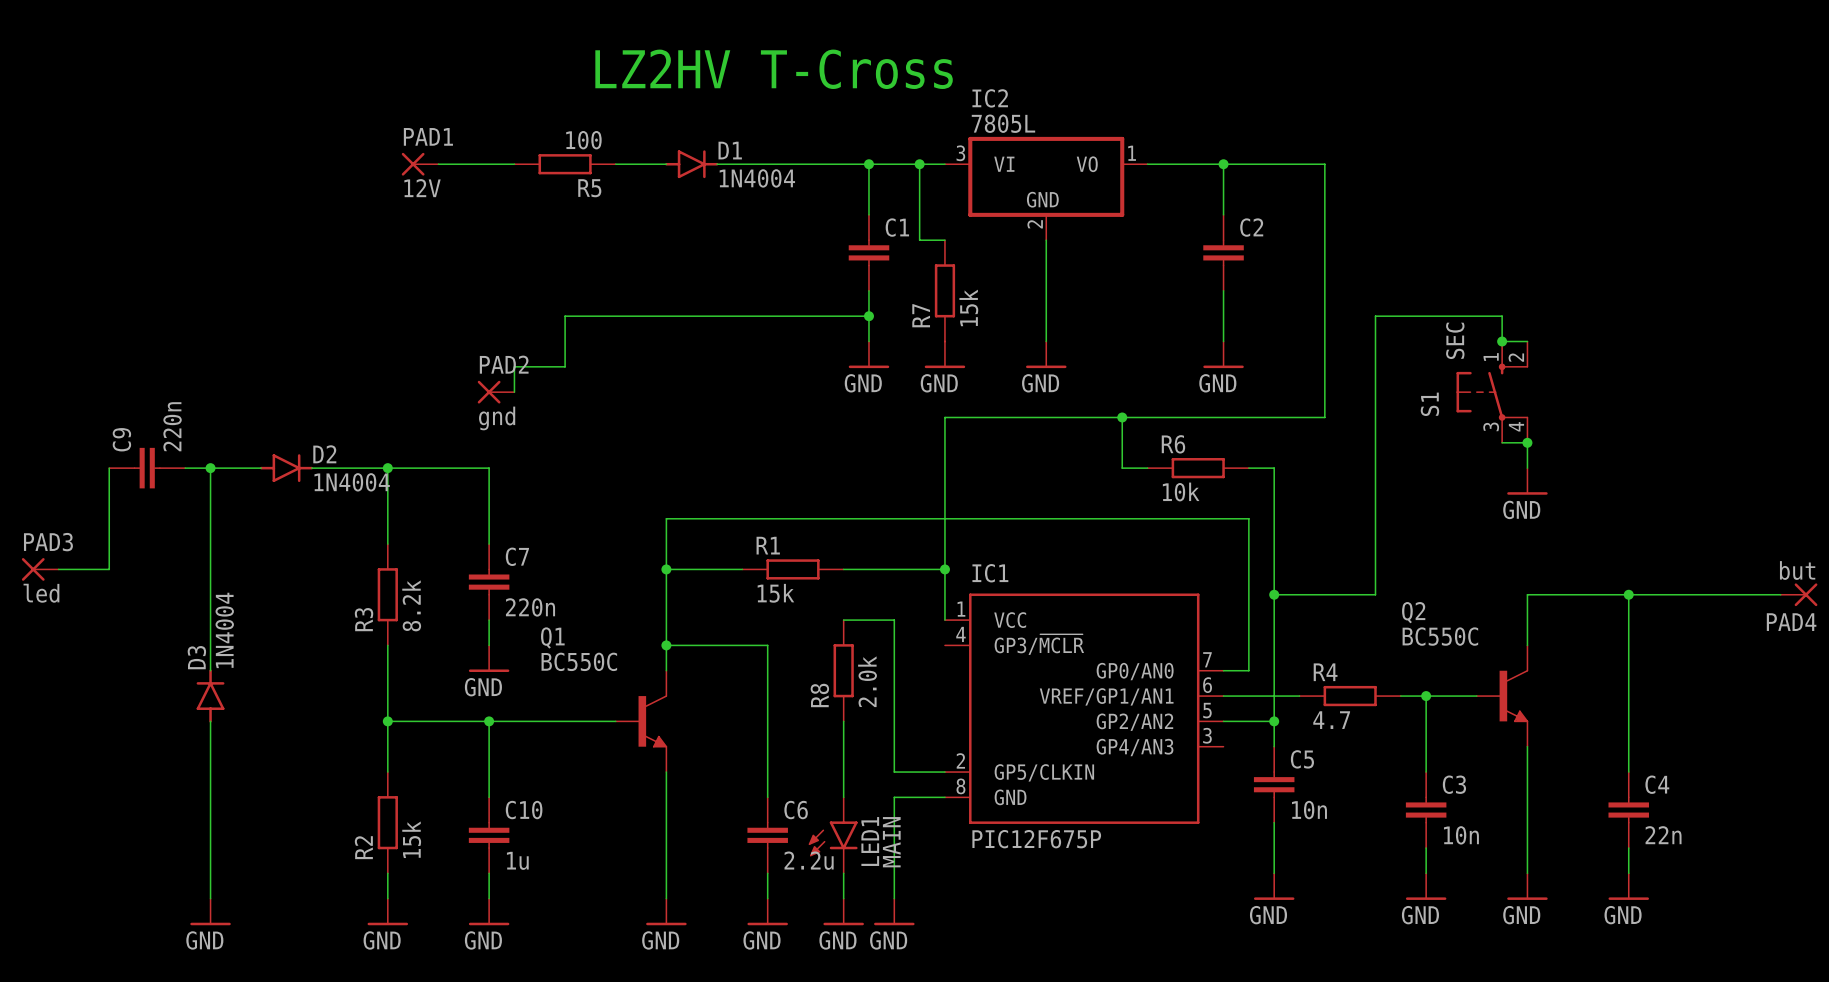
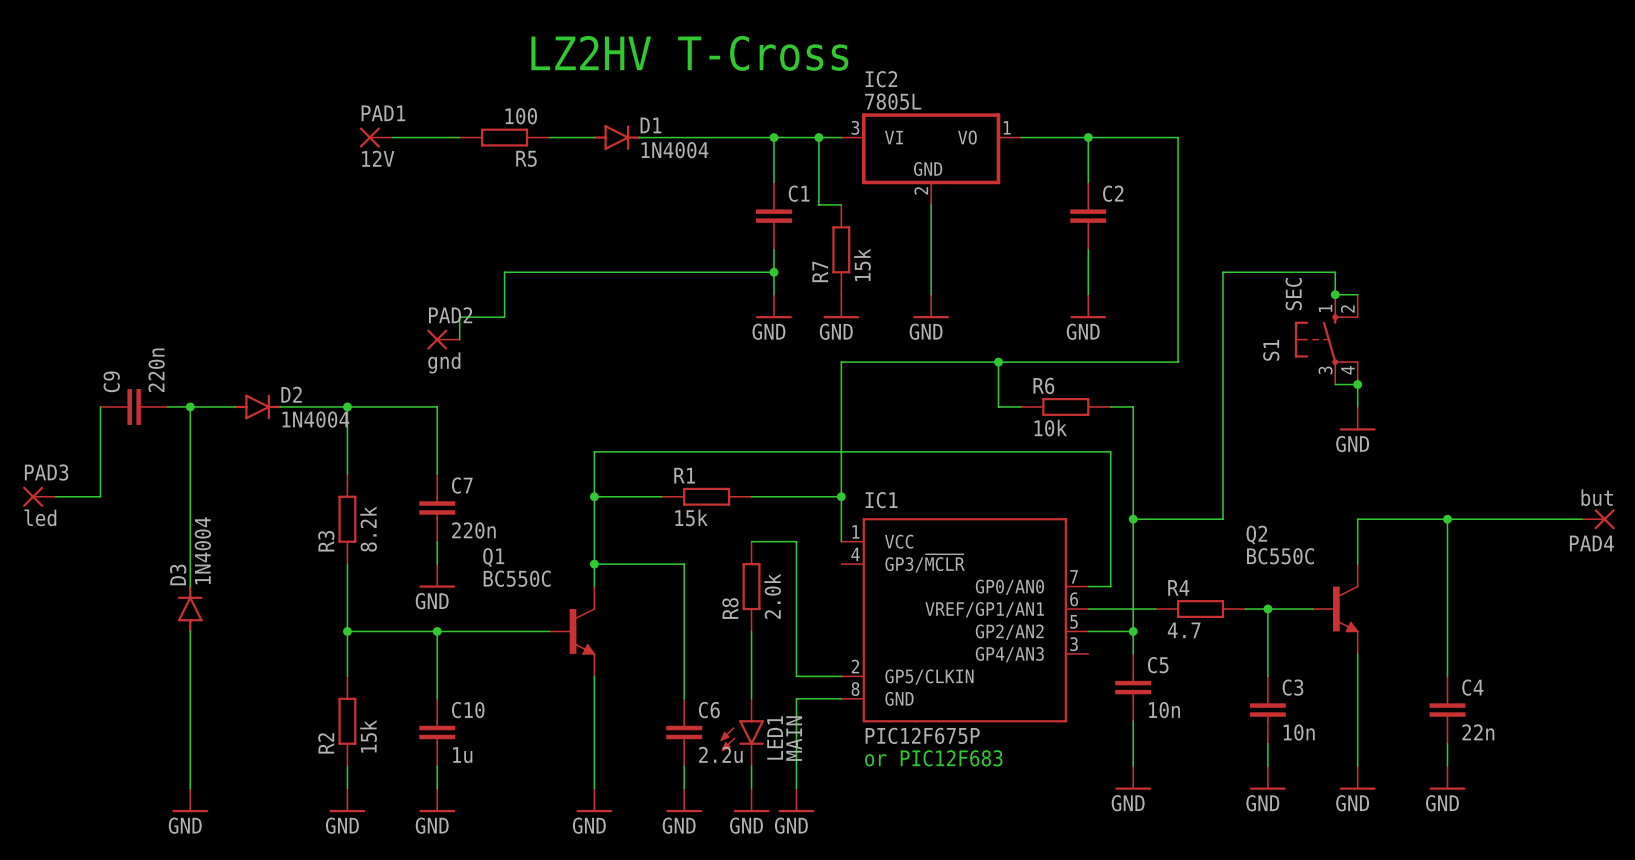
text: none -> or PIC12F683 (933, 758)

